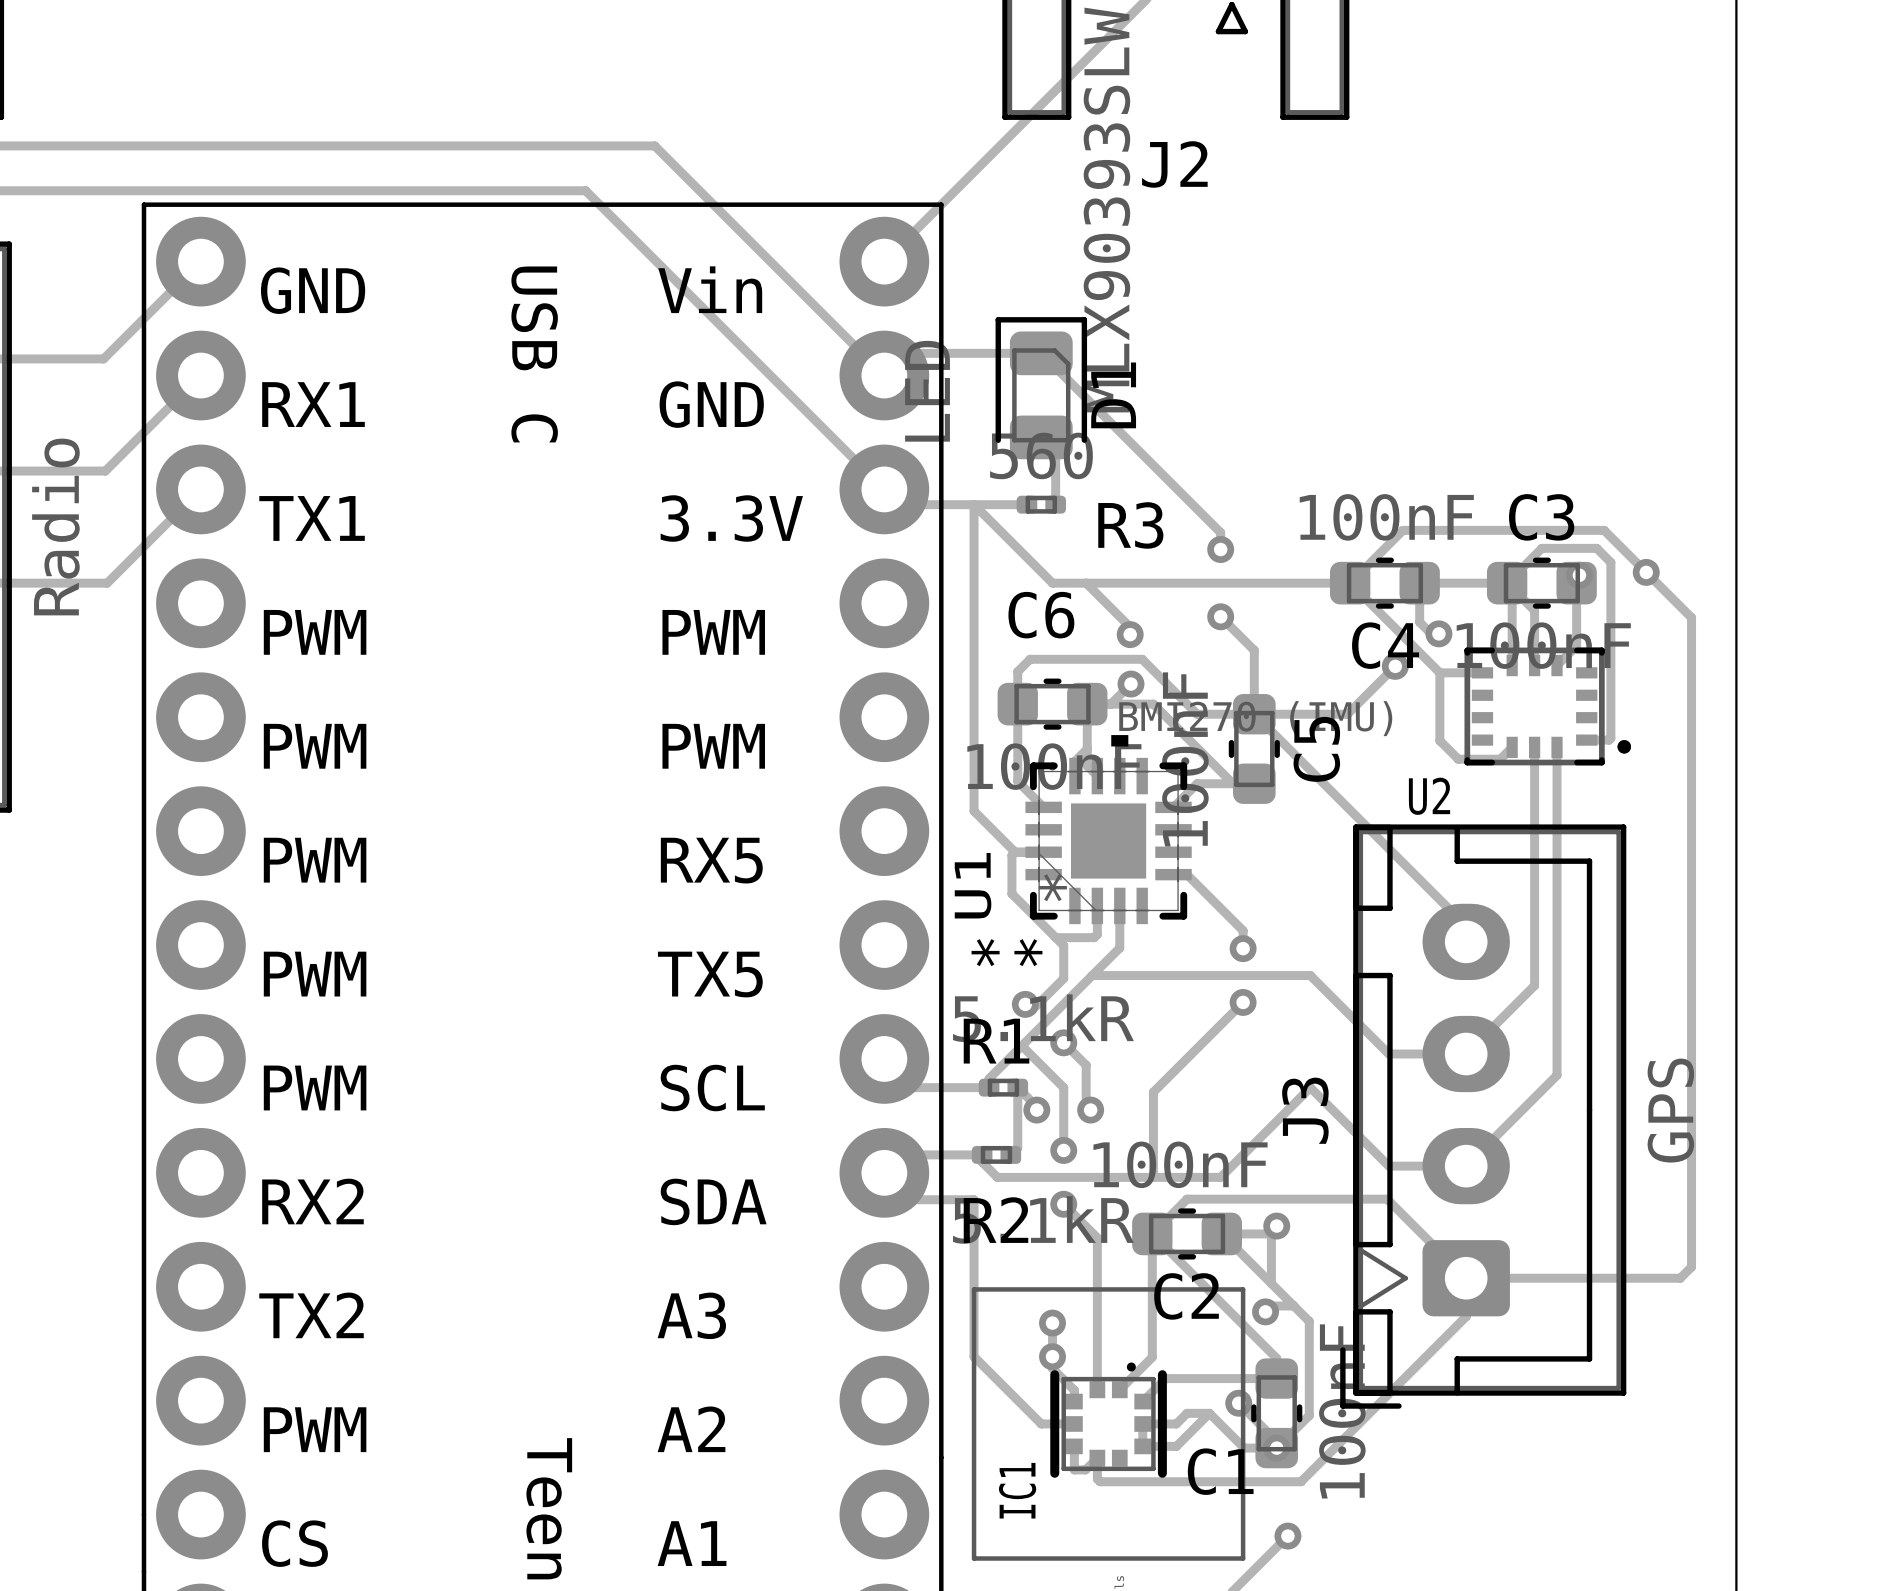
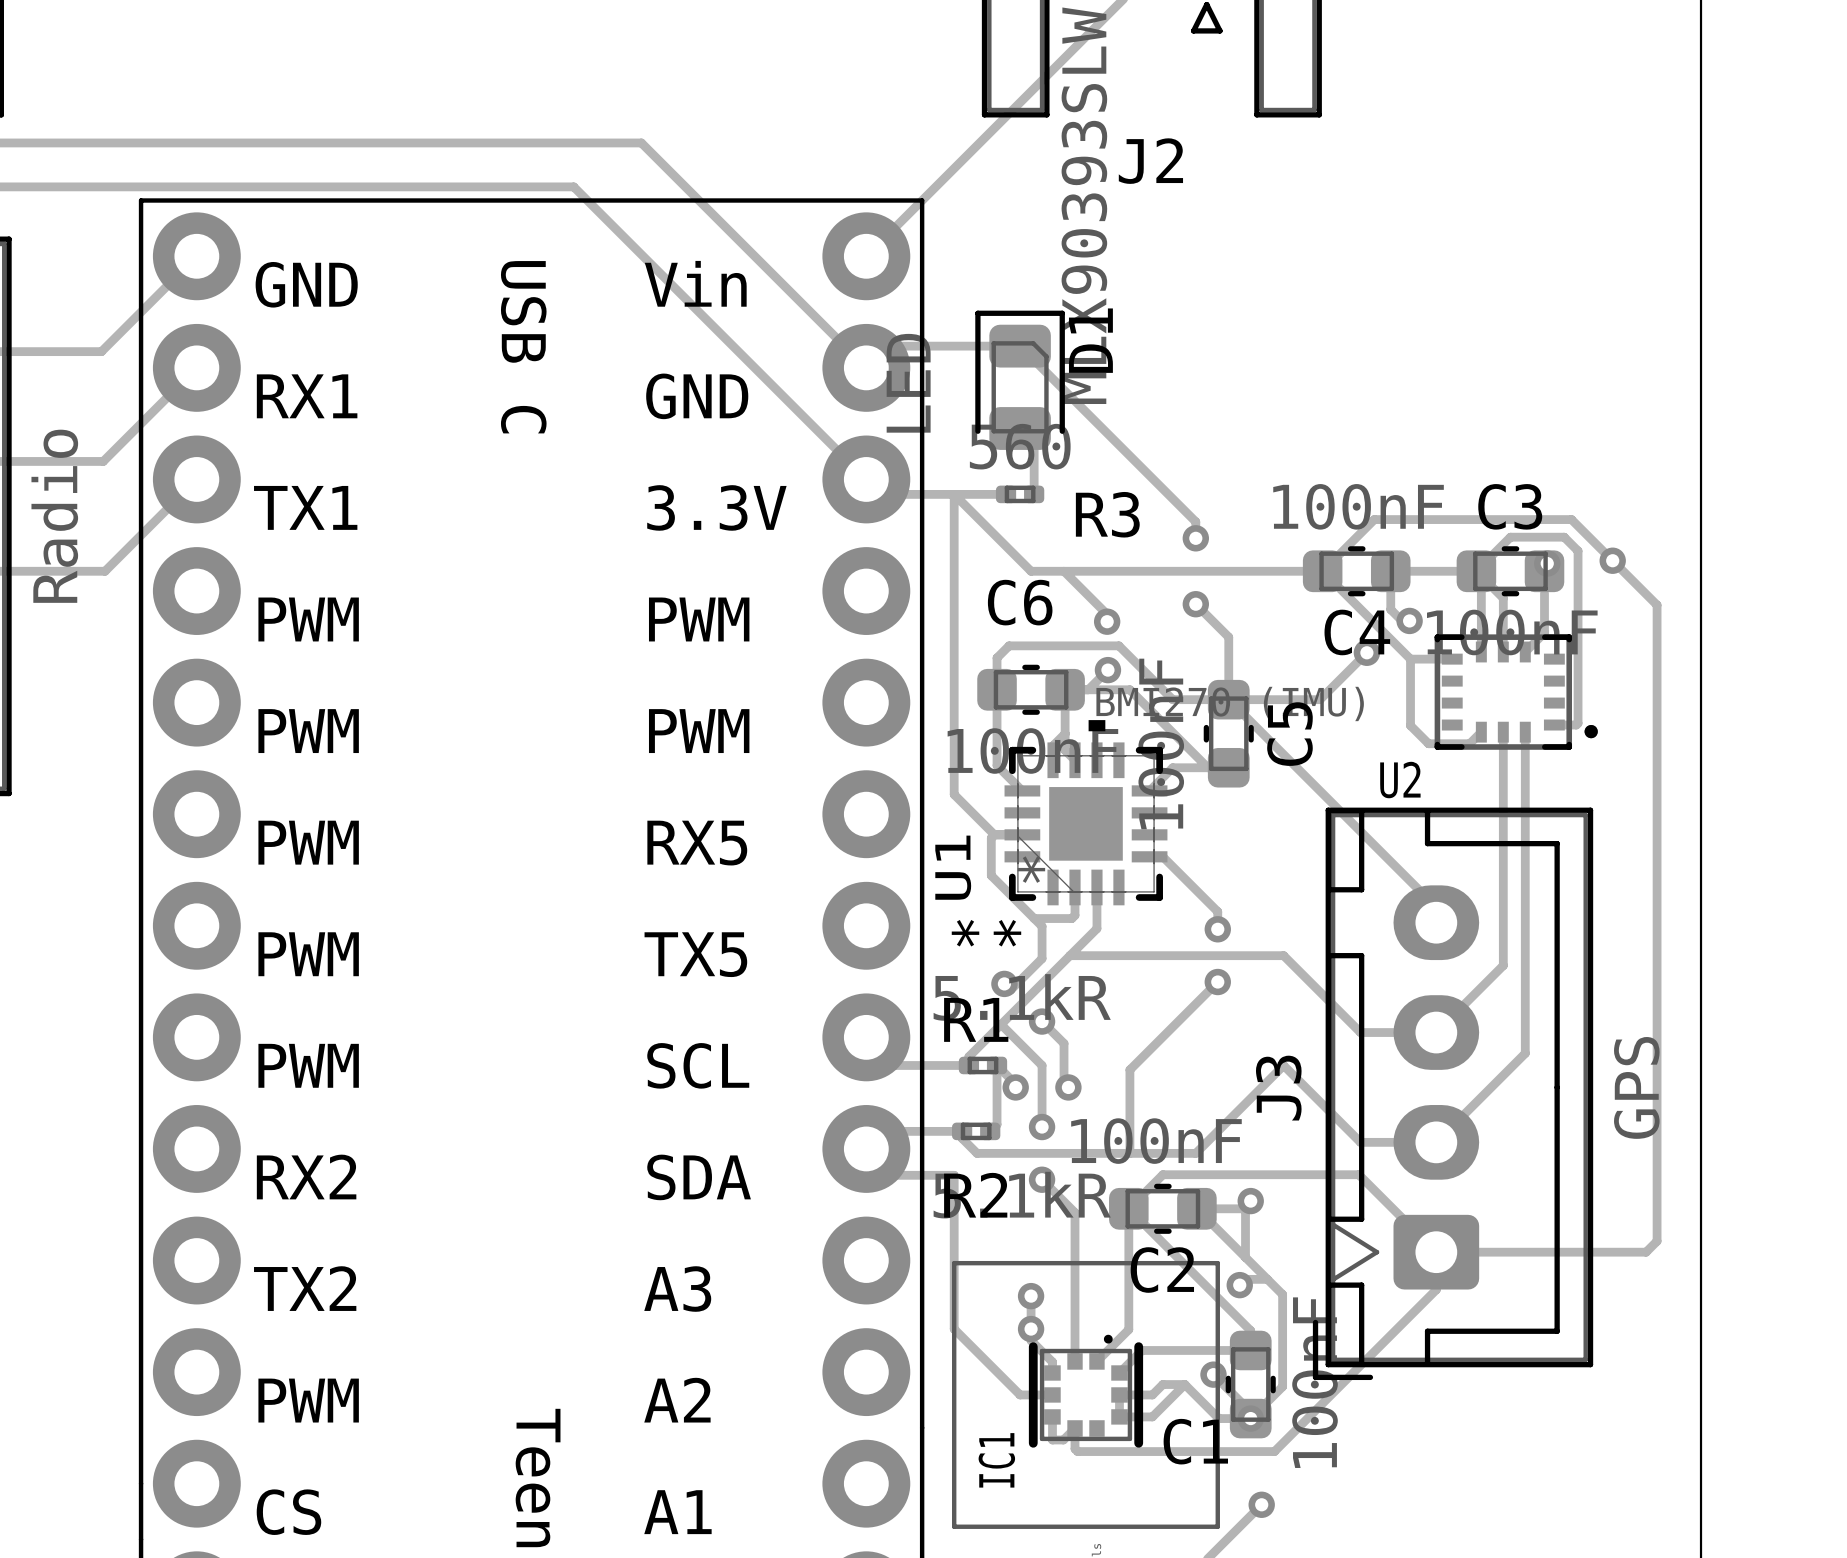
D1 name position: D1 (1113, 395) -> D1 (1090, 340)

